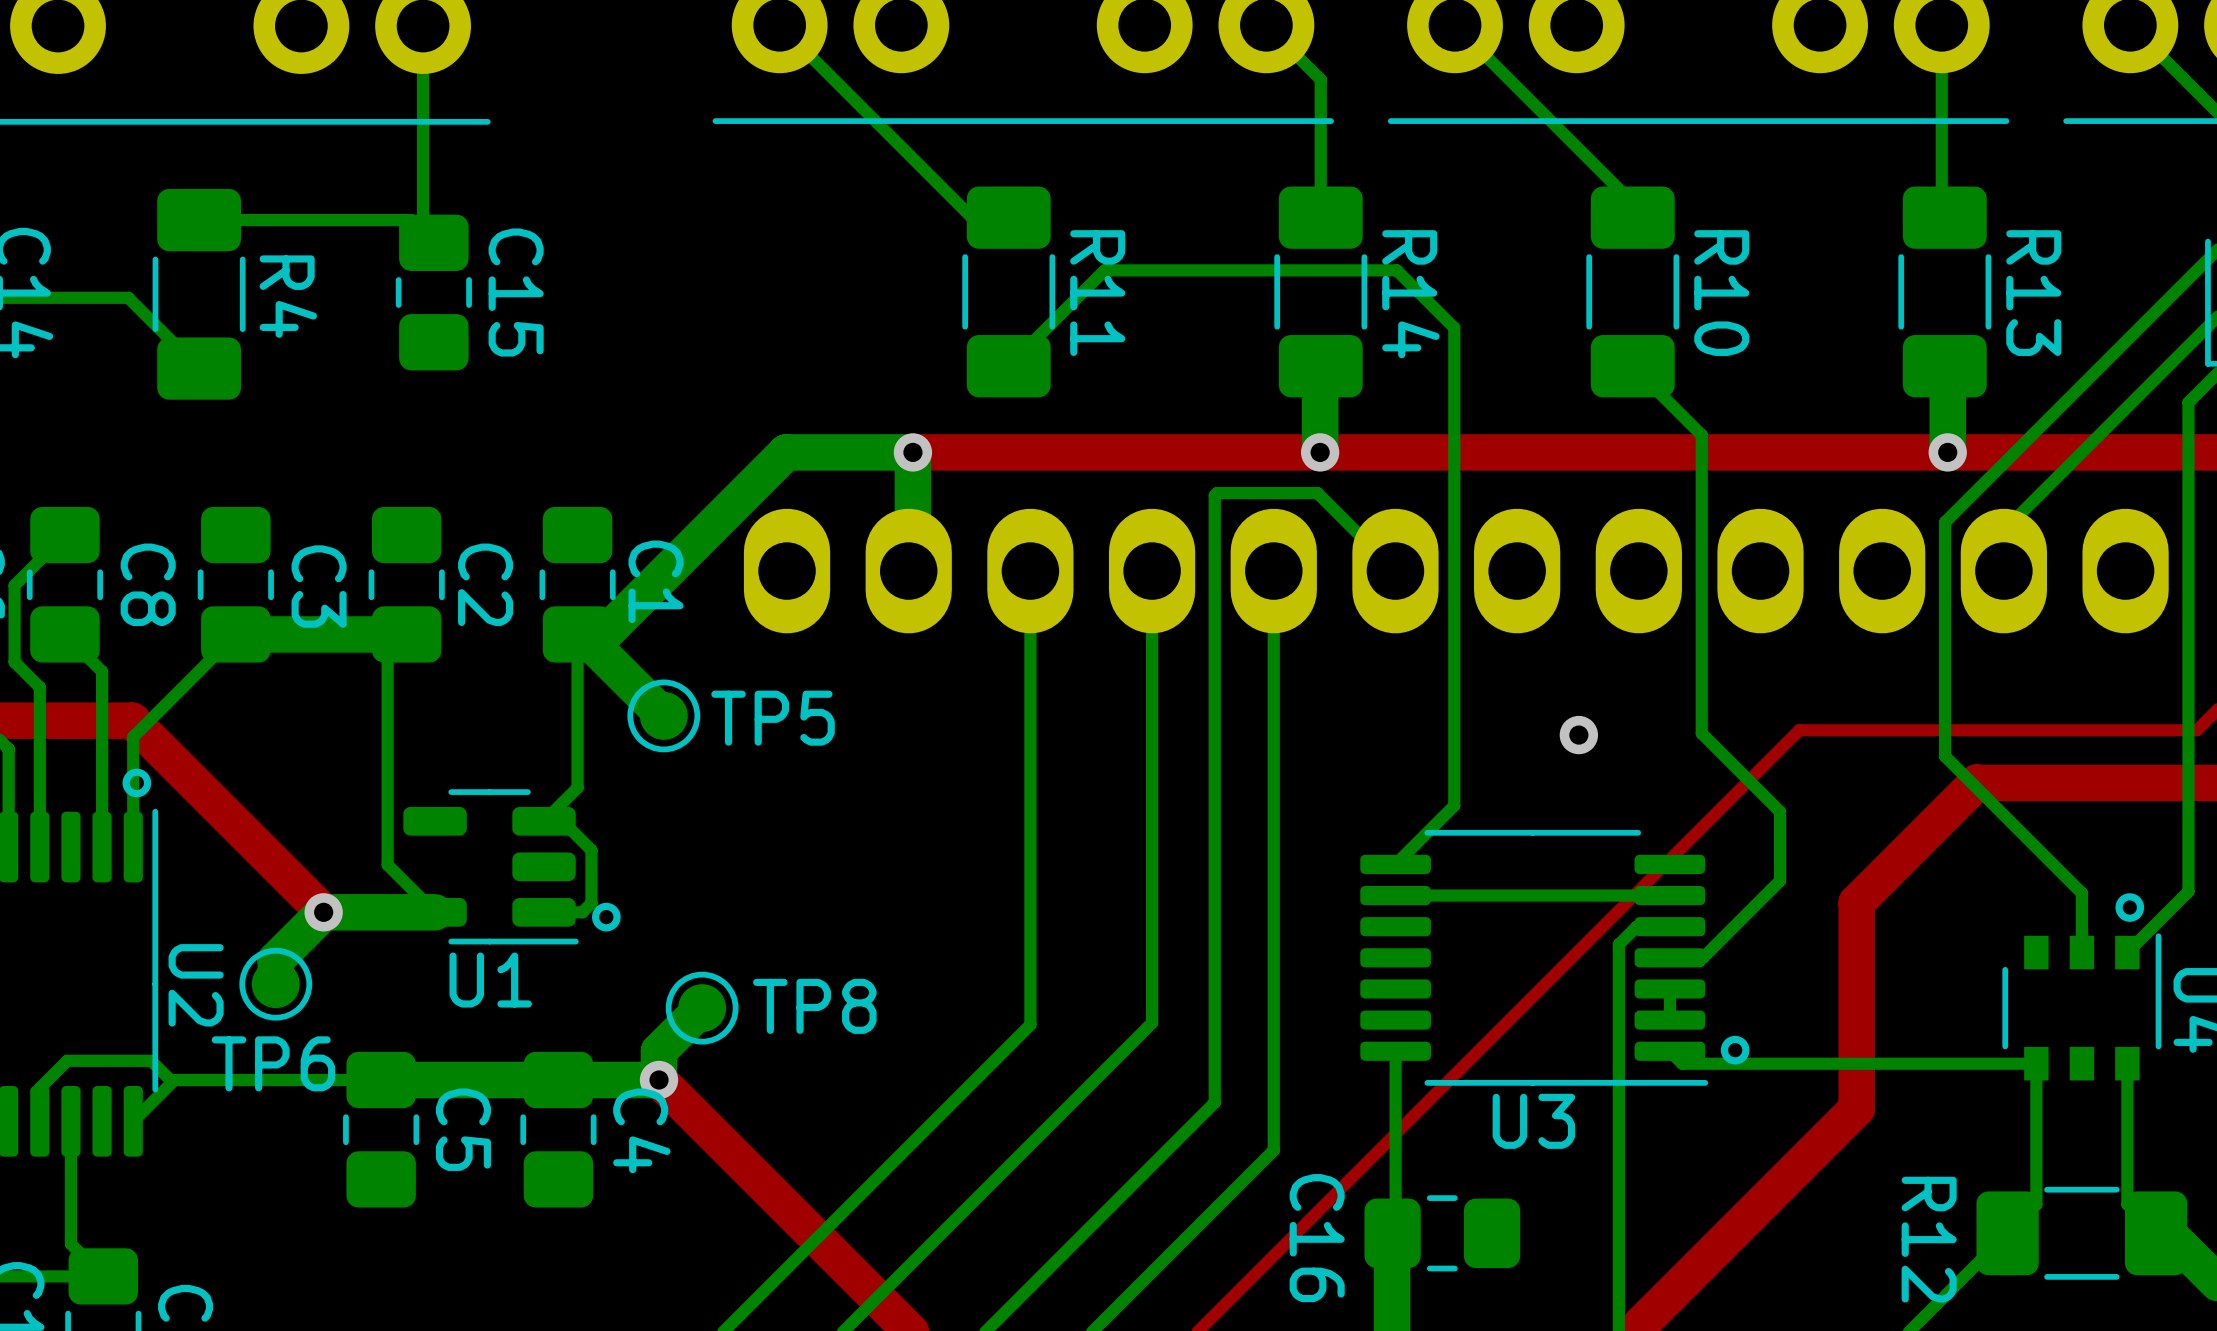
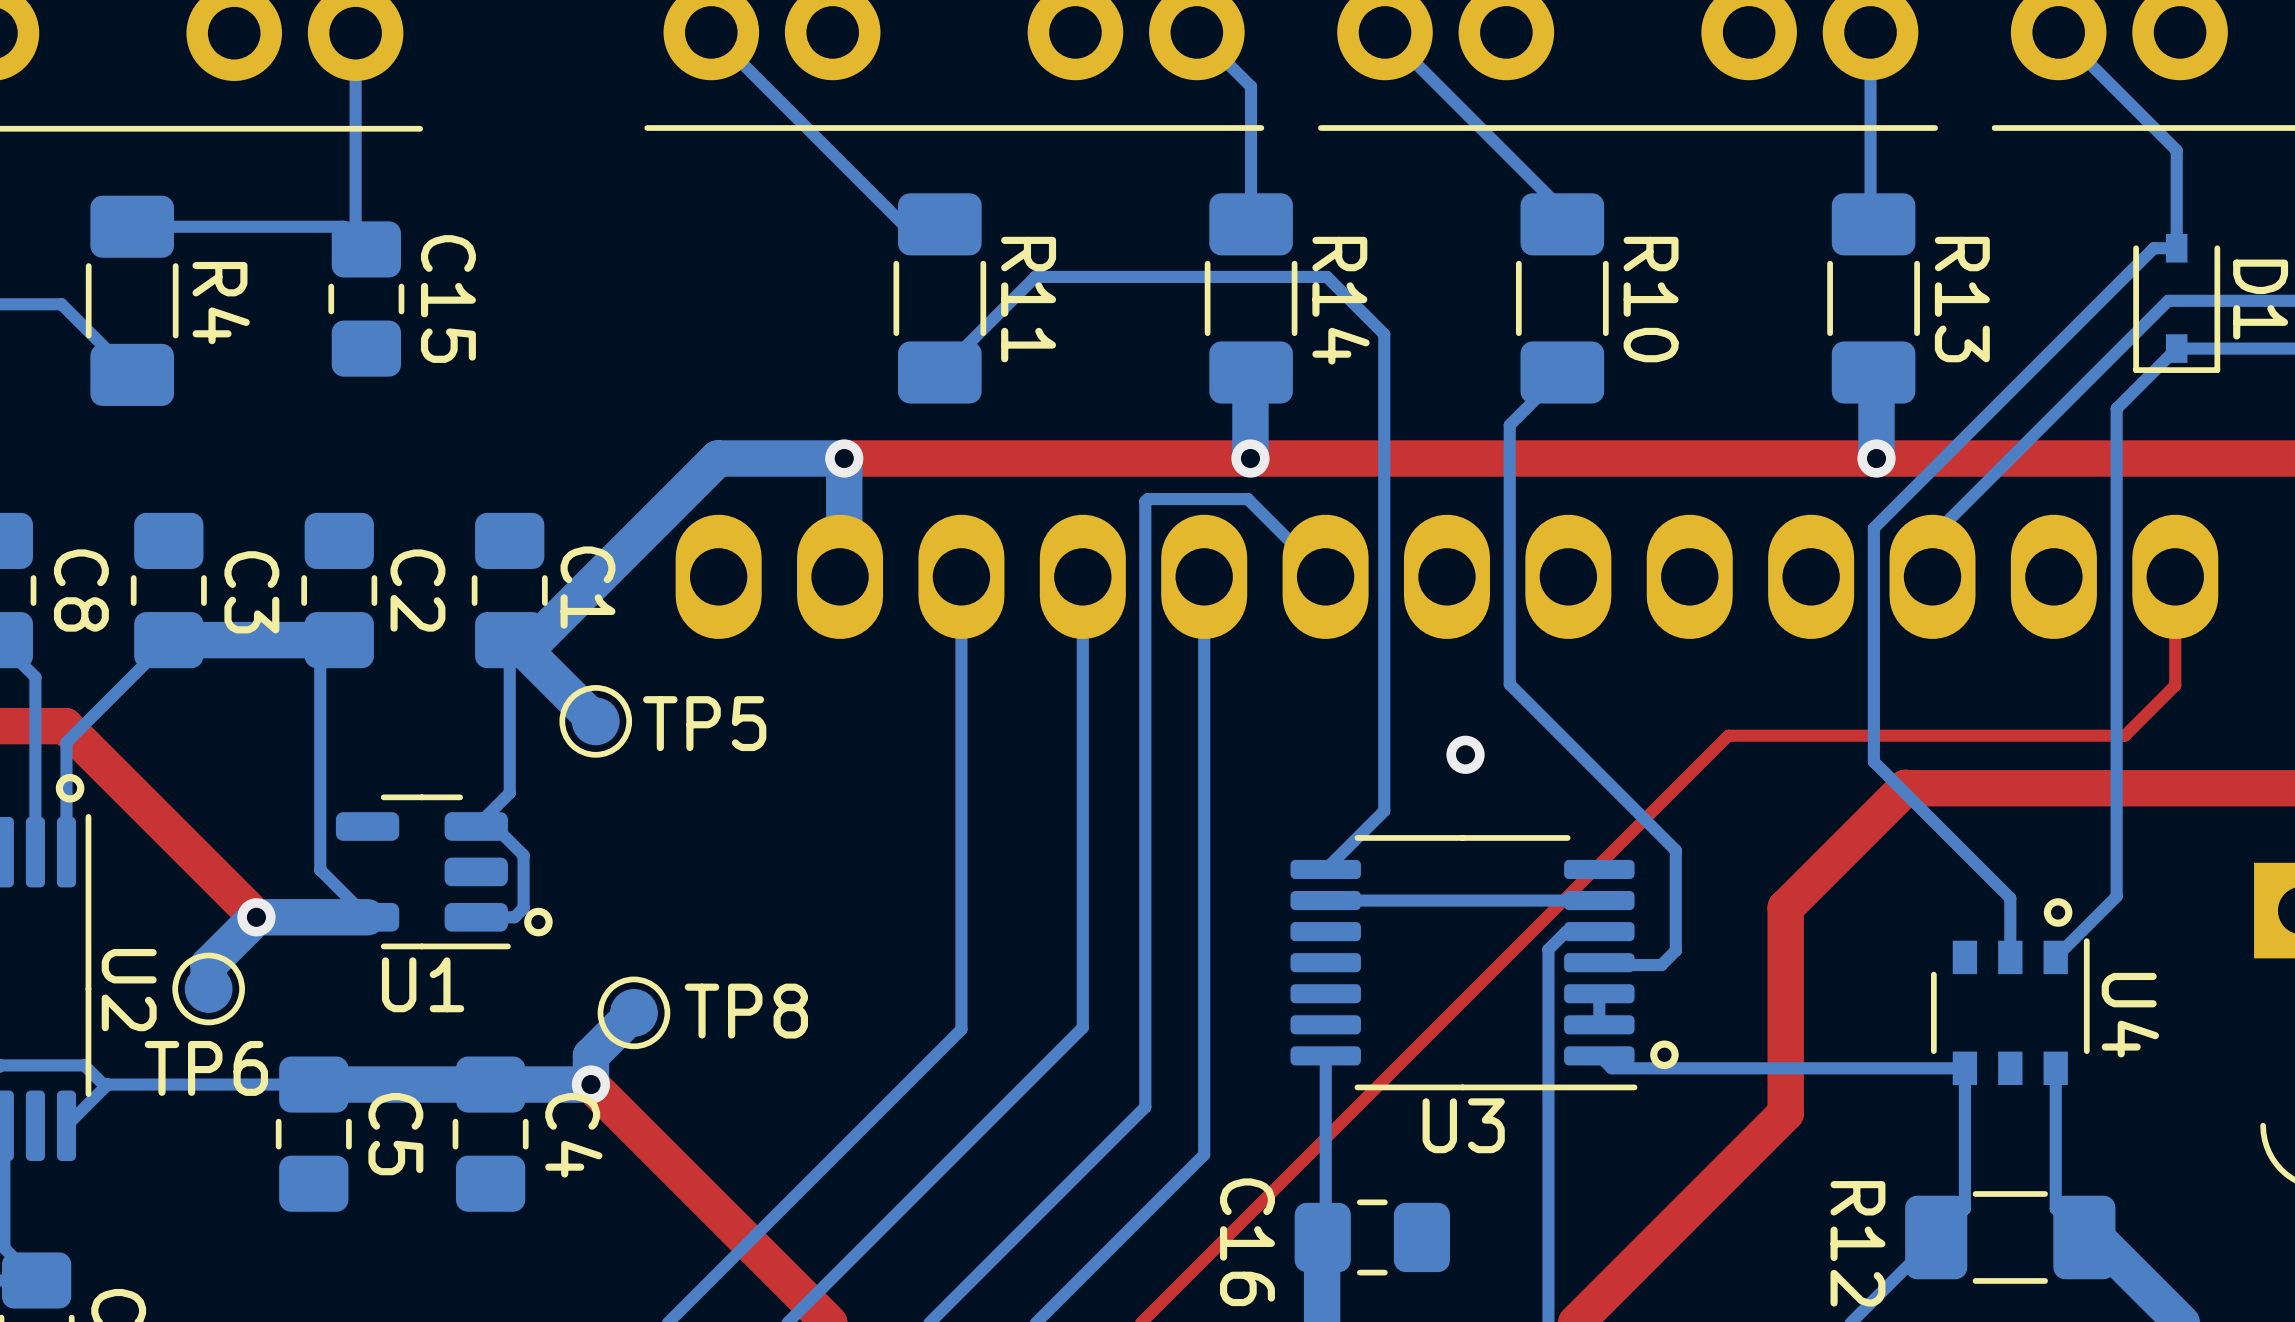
bottom track: (1632, 366) (1701, 435) (1701, 733) (1780, 811) (1780, 880) (1703, 957) (1669, 957) -> (1562, 372) (1509, 425) (1509, 684) (1675, 850) (1675, 950) (1661, 965) (1601, 965)
via position: (1578, 735) -> (1465, 754)

